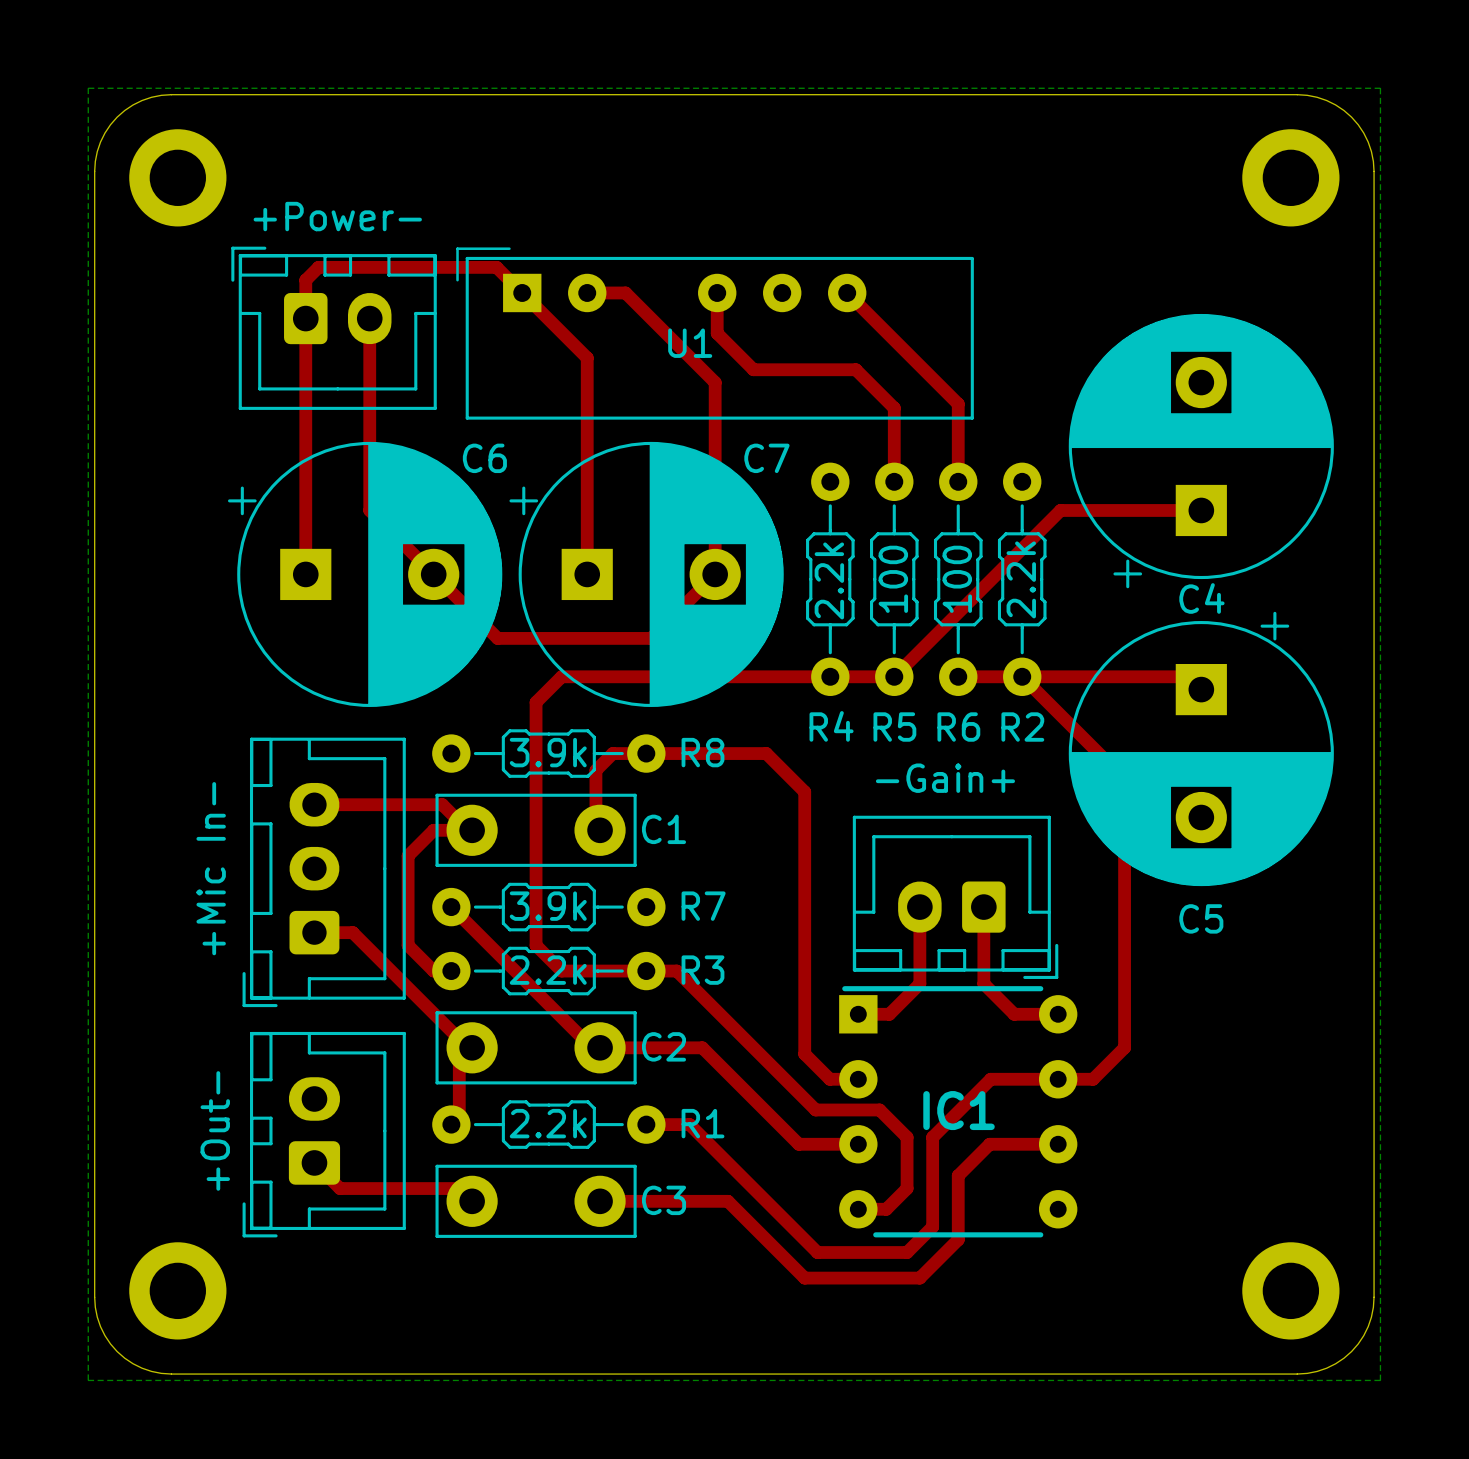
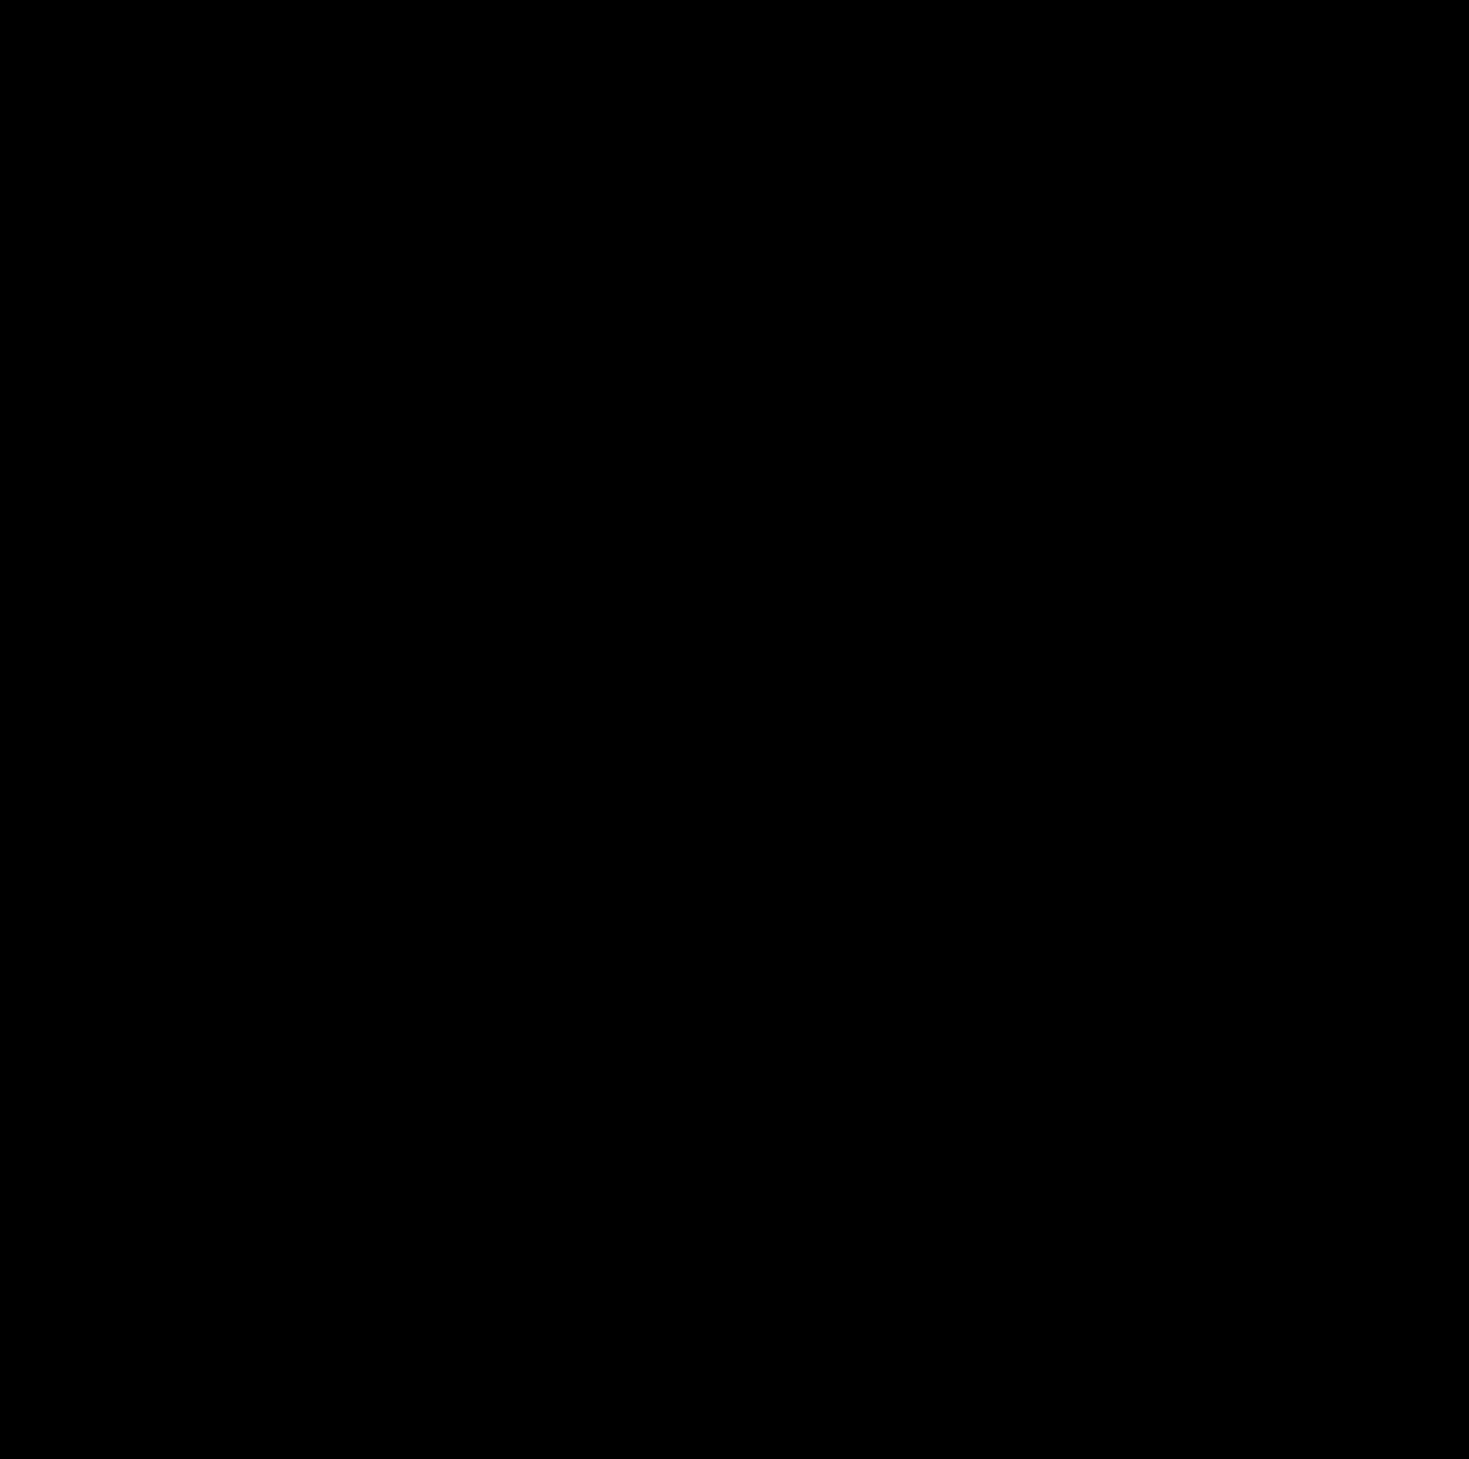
bottom zone outline: (88, 88) (1380, 88) (1380, 1380) (88, 1380) (88, 88) -> none
board edge: (171, 94) (1297, 94) (1326, 100) (1351, 117) (1368, 142) (1374, 171) (1374, 1297) (1368, 1326) (1351, 1351) (1326, 1368) (1297, 1374) (171, 1374) (142, 1368) (117, 1351) (100, 1326) (94, 1297) (94, 171) (100, 142) (117, 117) (142, 100) (171, 94) -> none
part: (177, 177) -> none
part: (1290, 177) -> none
top track: (587, 292) (625, 292) (715, 382) (715, 574) (651, 638) (497, 638) (369, 510) (369, 318) -> none
top track: (717, 292) (717, 333) (753, 369) (855, 369) (894, 408) (894, 481) -> none
top track: (847, 292) (958, 404) (958, 481) -> none
part: +Power- (334, 328) -> none
U1: (715, 333) -> none
C4: (1201, 451) -> none
top track: (1201, 510) (1060, 510) (894, 676) (561, 676) (536, 702) (536, 945) (561, 971) (676, 971) (815, 1109) (879, 1109) (907, 1137) (907, 1188) (886, 1209) (858, 1209) -> none
top track: (305, 574) (305, 280) (318, 267) (496, 267) (587, 357) (587, 574) -> none
C6: (365, 574) -> none
C7: (646, 574) -> none
R4: 2.2k (830, 579) -> none
R5: 100 (894, 579) -> none
R6: 100 (958, 579) -> none
R2: 2.2k (1022, 579) -> none
top track: (958, 676) (1188, 676) (1201, 689) -> none
top track: (1022, 676) (1124, 779) (1124, 1047) (1093, 1079) (990, 1079) (932, 1137) (932, 1226) (907, 1252) (817, 1252) (689, 1124) (646, 1124) -> none
C5: (1201, 748) -> none
R8: 3.9k (548, 753) -> none
top track: (314, 804) (442, 804) (468, 830) (433, 830) (408, 855) (408, 945) (433, 971) (456, 971) -> none
C1: (536, 830) -> none
top track: (595, 830) (595, 770) (612, 753) (766, 753) (804, 791) (804, 1054) (829, 1079) (858, 1079) -> none
part: +Mic In- (324, 872) -> none
part: -Gain+ (955, 897) -> none
top track: (451, 907) (592, 1047) (702, 1047) (798, 1144) (858, 1144) -> none
R7: 3.9k (548, 907) -> none
top track: (919, 907) (919, 983) (889, 1014) (858, 1014) -> none
top track: (983, 907) (983, 983) (1014, 1014) (1058, 1014) -> none
top track: (314, 932) (352, 932) (459, 1039) (459, 1124) -> none
R3: 2.2k (548, 971) -> none
C2: (536, 1047) -> none
IC1: (958, 1111) -> none
R1: 2.2k (548, 1124) -> none
part: +Out- (324, 1134) -> none
top track: (1058, 1144) (989, 1144) (958, 1175) (958, 1239) (919, 1278) (804, 1278) (727, 1201) (600, 1201) -> none
top track: (314, 1162) (340, 1188) (459, 1188) -> none
C3: (536, 1201) -> none
part: (177, 1290) -> none
part: (1290, 1290) -> none

